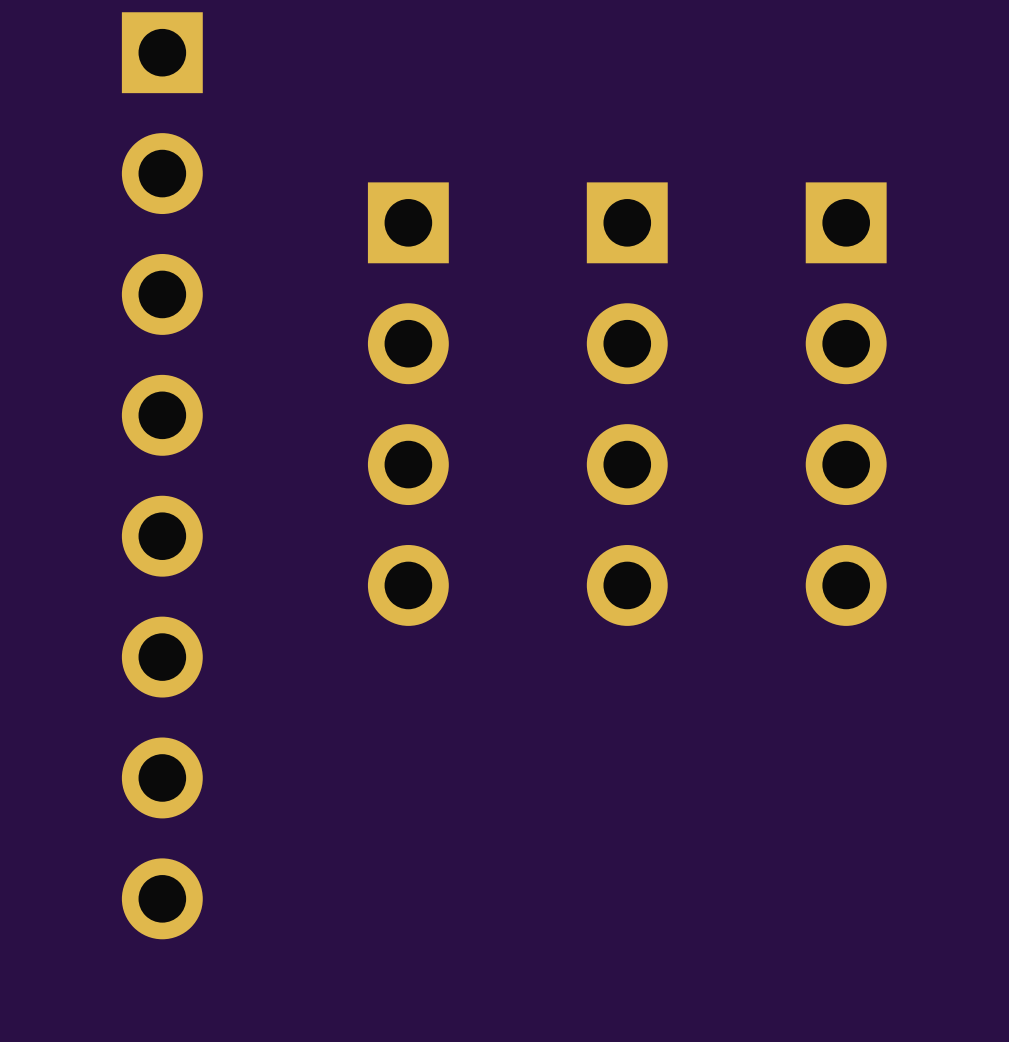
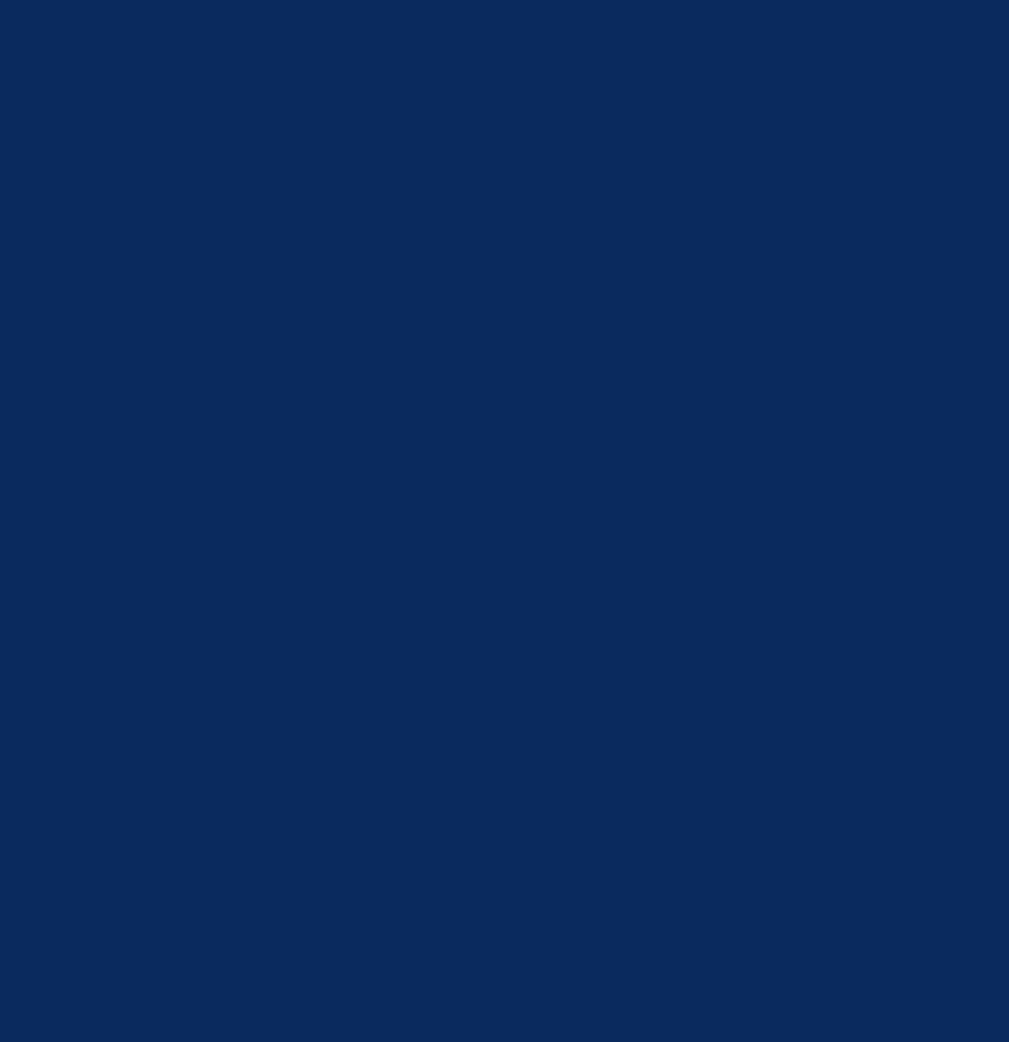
part: (408, 404) -> none
part: (627, 404) -> none
part: (846, 404) -> none
part: (162, 475) -> none

